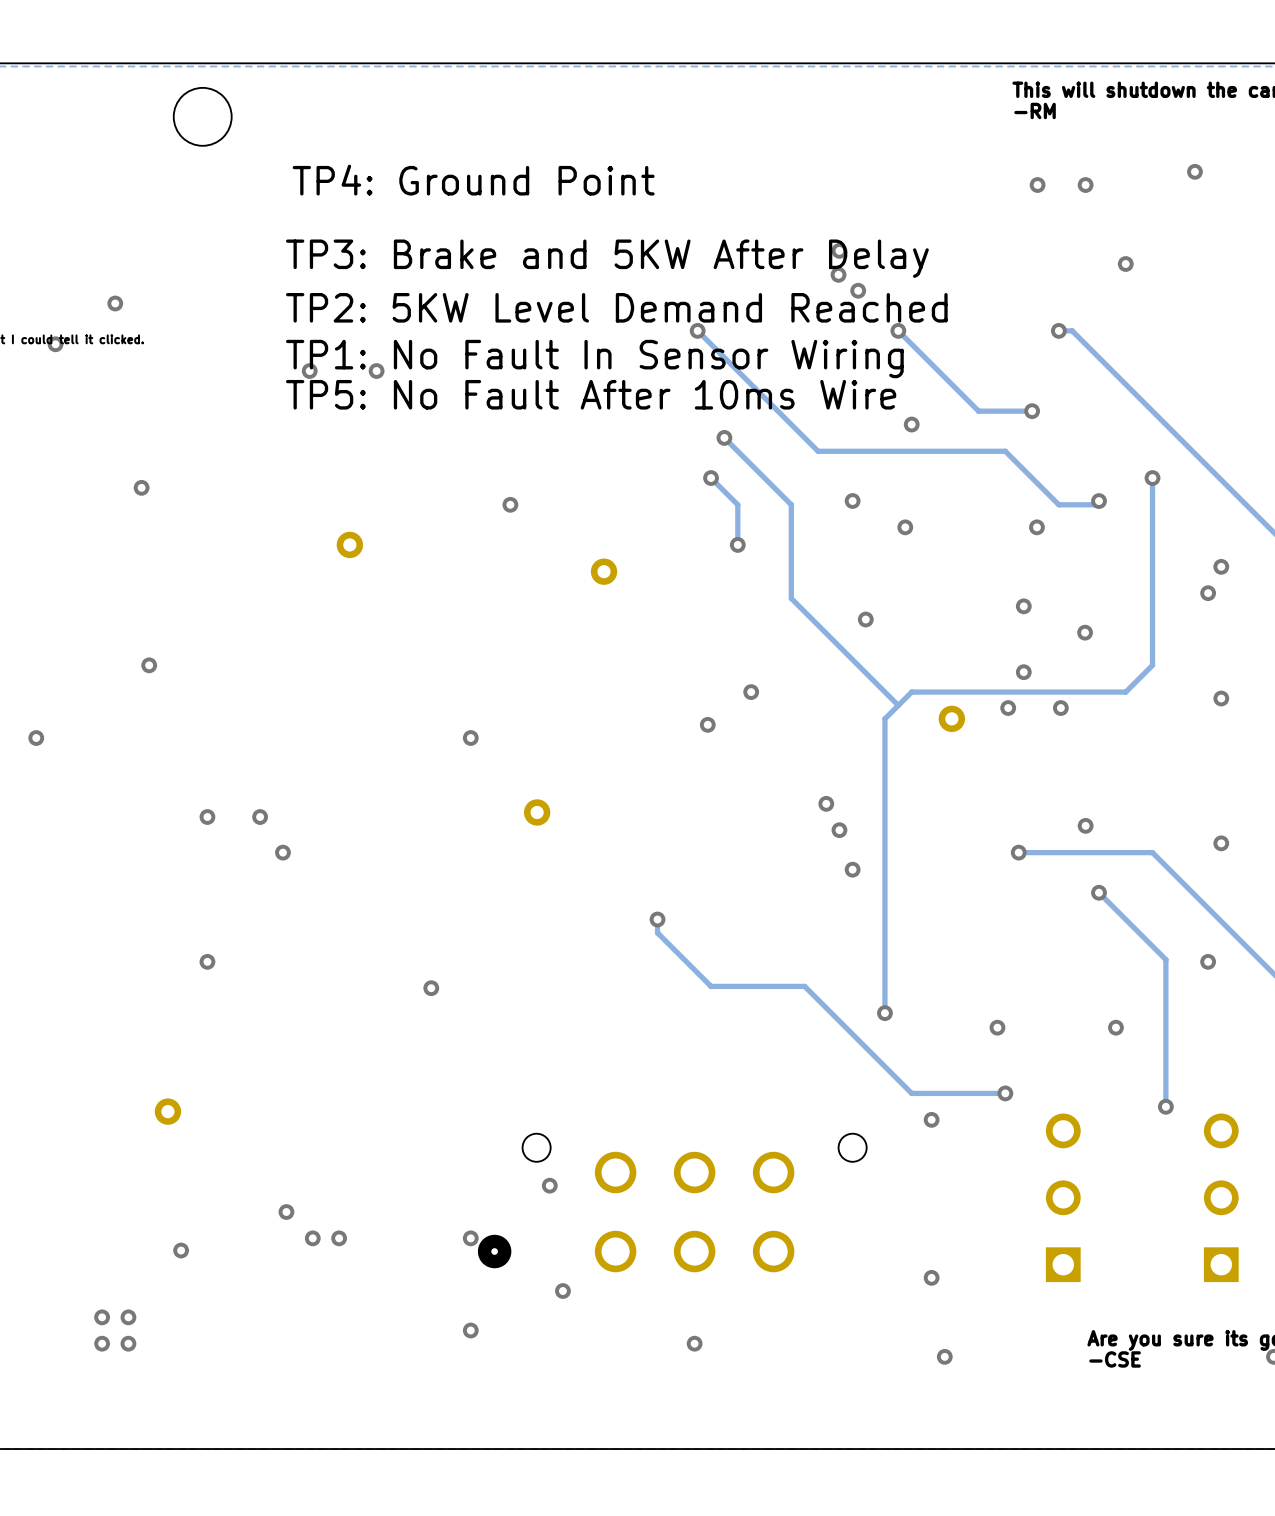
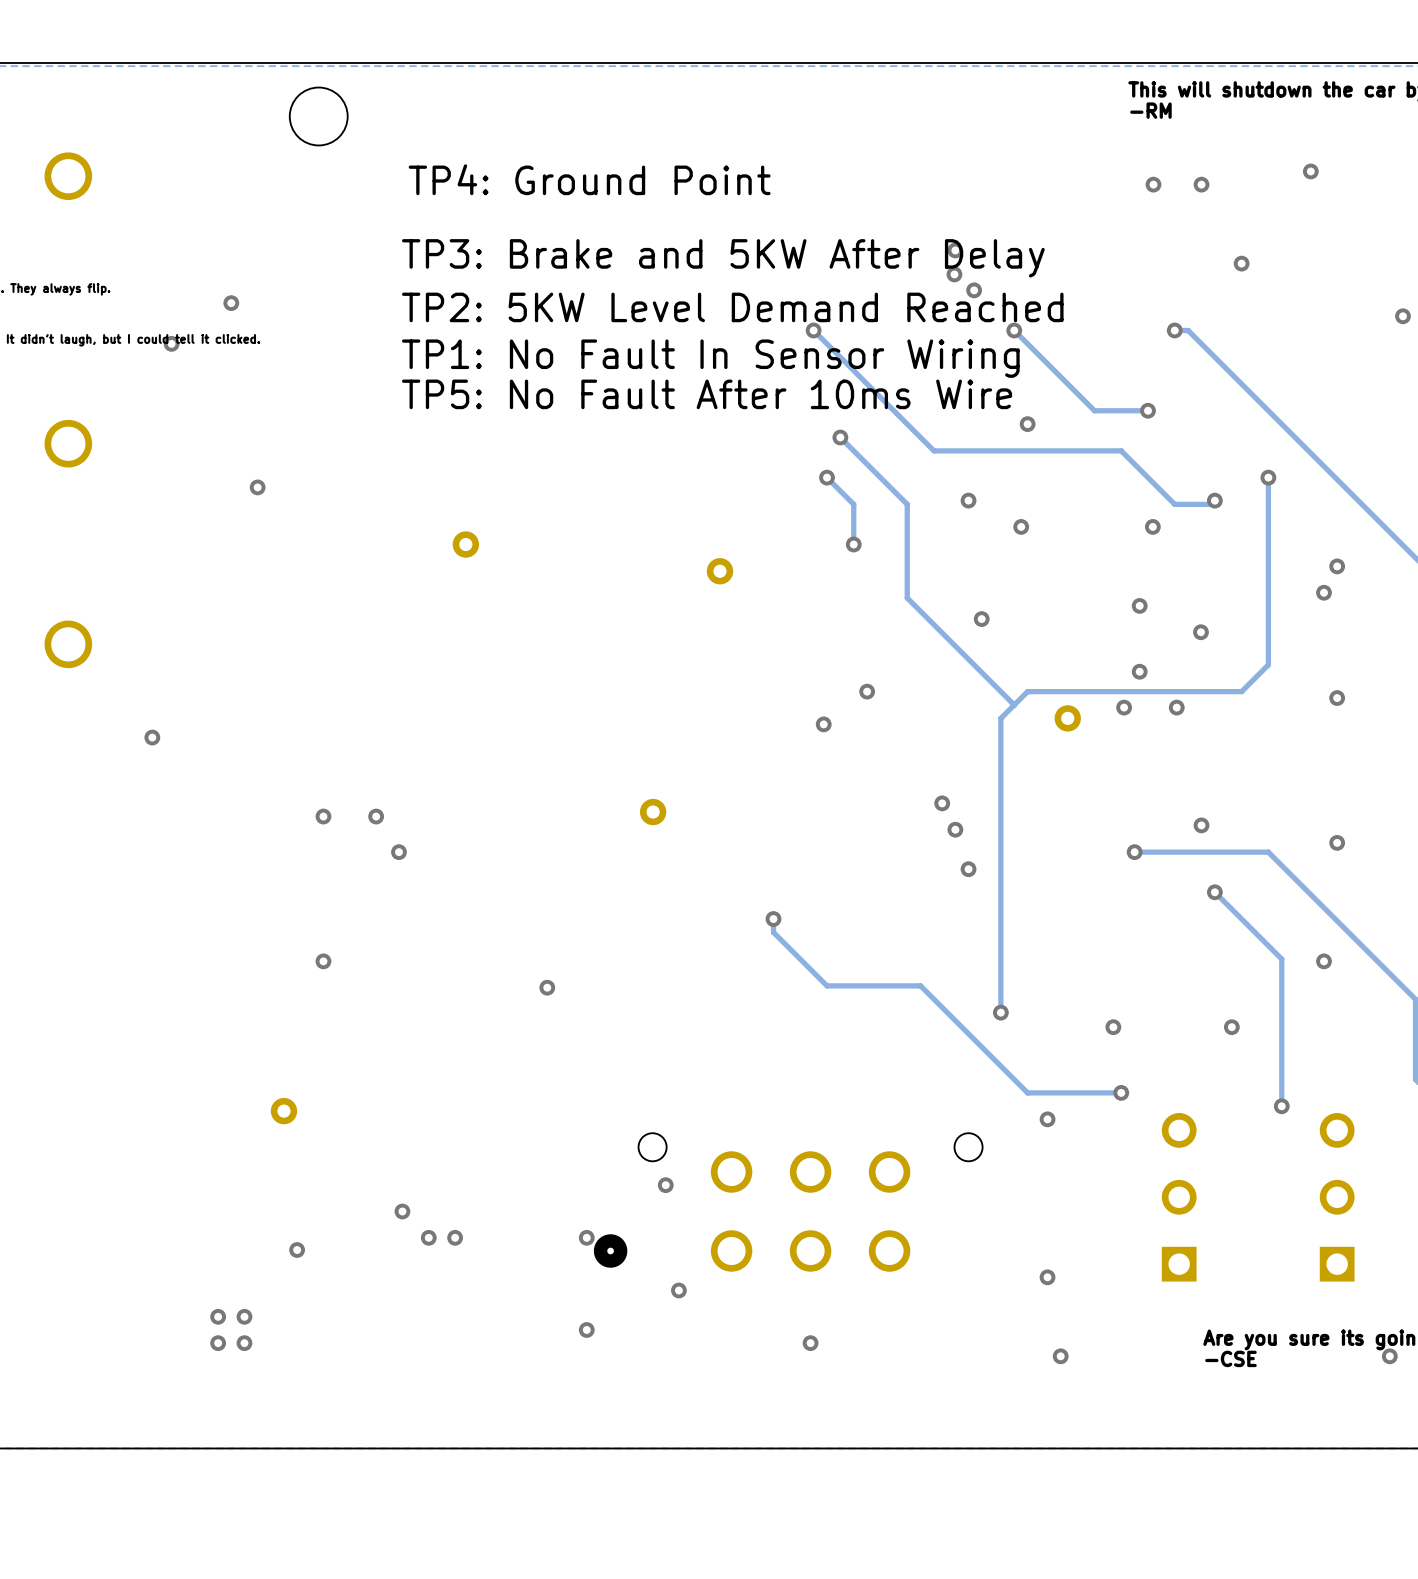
via: (309, 371) -> none
via: (376, 371) -> none
via: (510, 504) -> none
via: (149, 665) -> none
via: (470, 738) -> none

